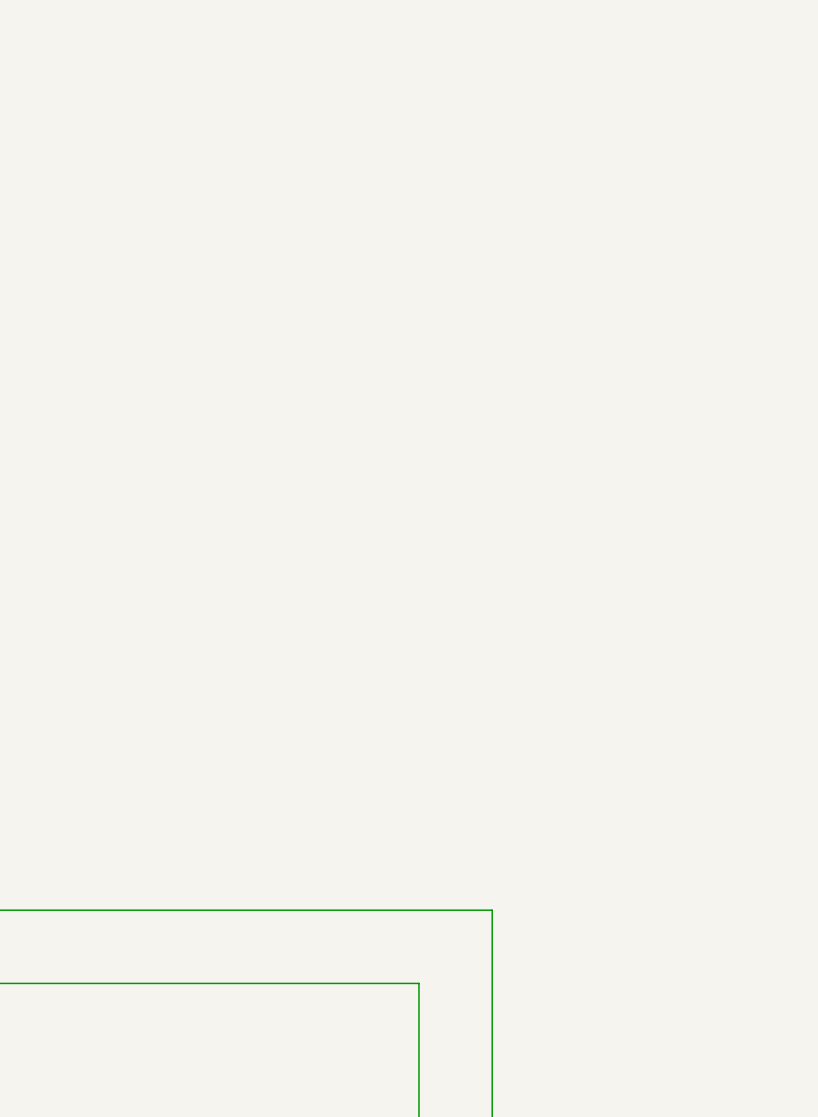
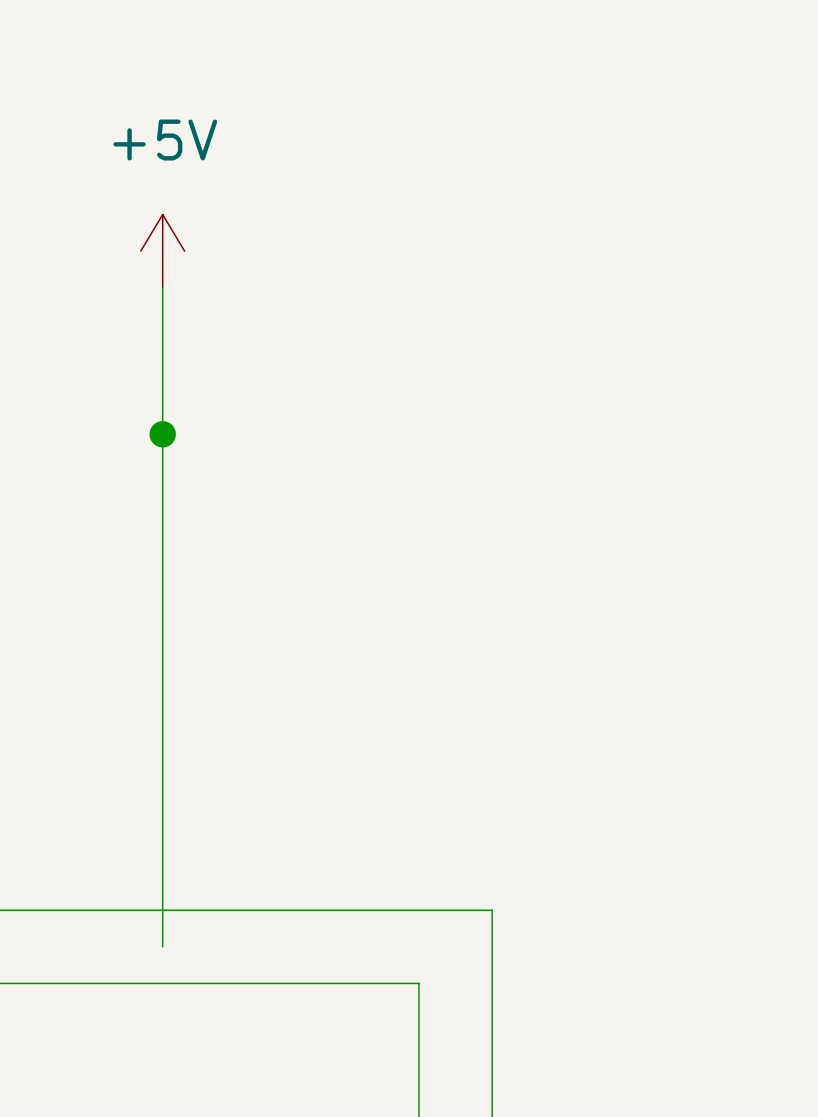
power symbol: none -> +5V (162, 251)
wire: none -> (162, 287) (162, 946)
junction: none -> (162, 434)

